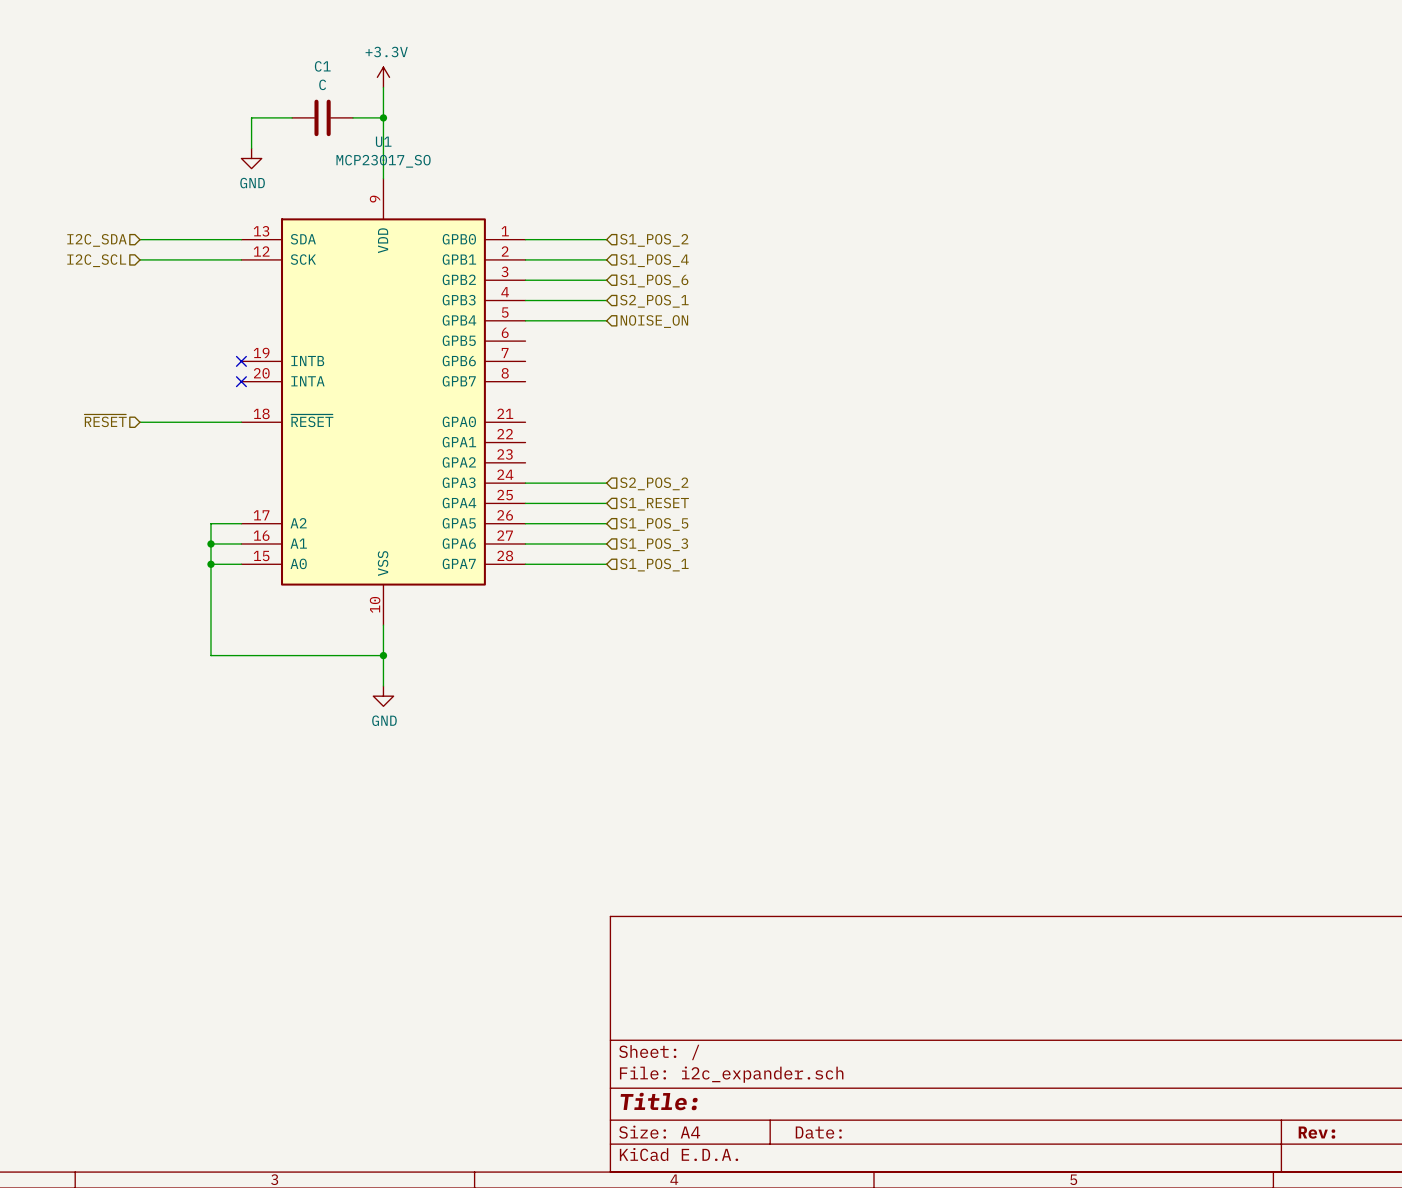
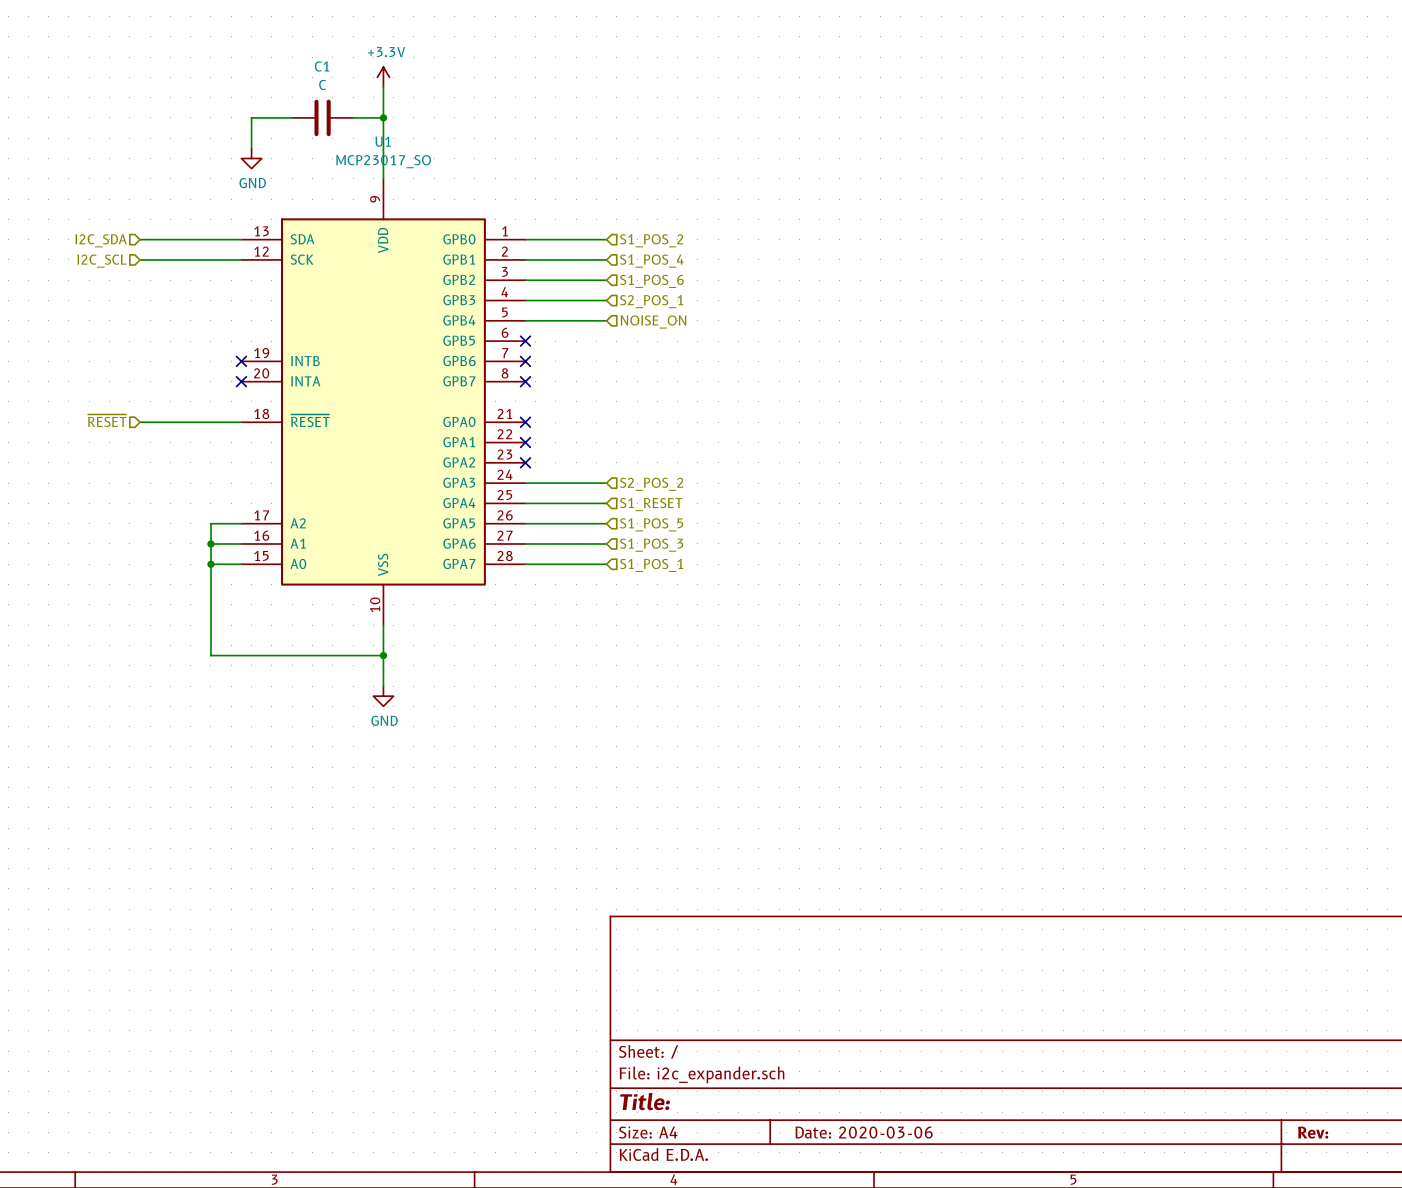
no-connect mark: none -> (525, 341)
no-connect mark: none -> (525, 361)
no-connect mark: none -> (525, 381)
no-connect mark: none -> (525, 422)
no-connect mark: none -> (525, 442)
no-connect mark: none -> (525, 462)
title block: Date: (818, 1132) -> Date: 2020-03-06 (864, 1132)

